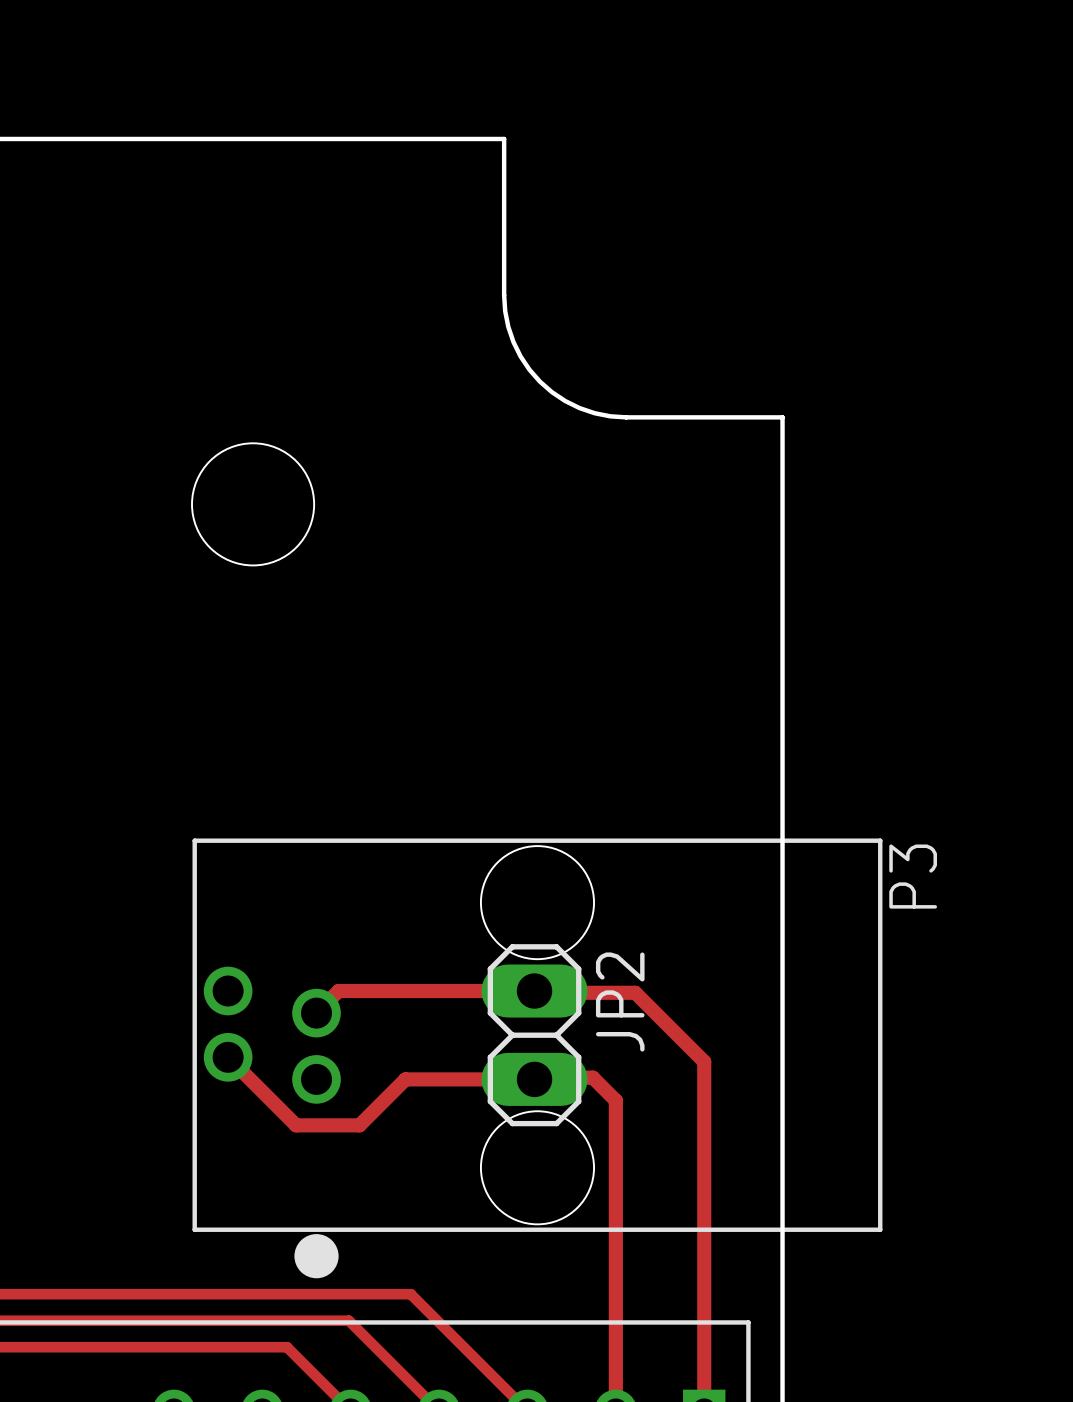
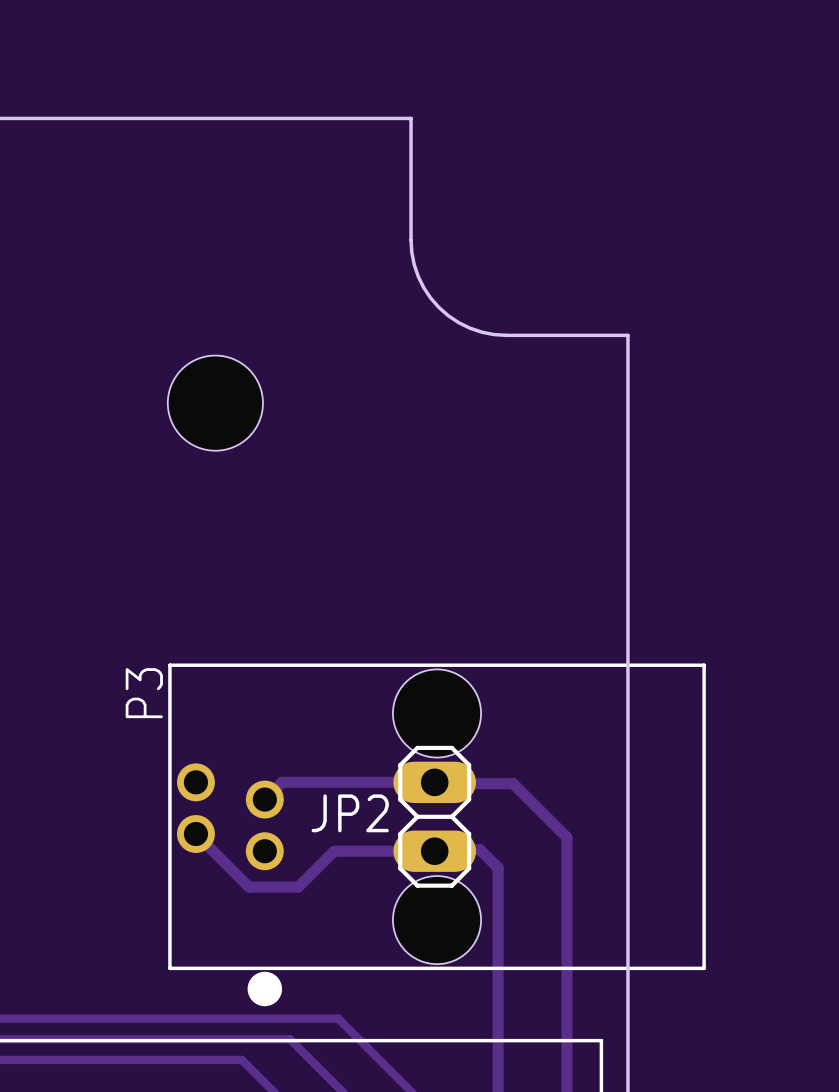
P3 name position: P3 (913, 876) -> P3 (144, 693)
JP2 name rotation: 0° (620, 1002) -> 90° clockwise (350, 813)
JP2 name position: JP2 (620, 1002) -> JP2 (350, 813)

